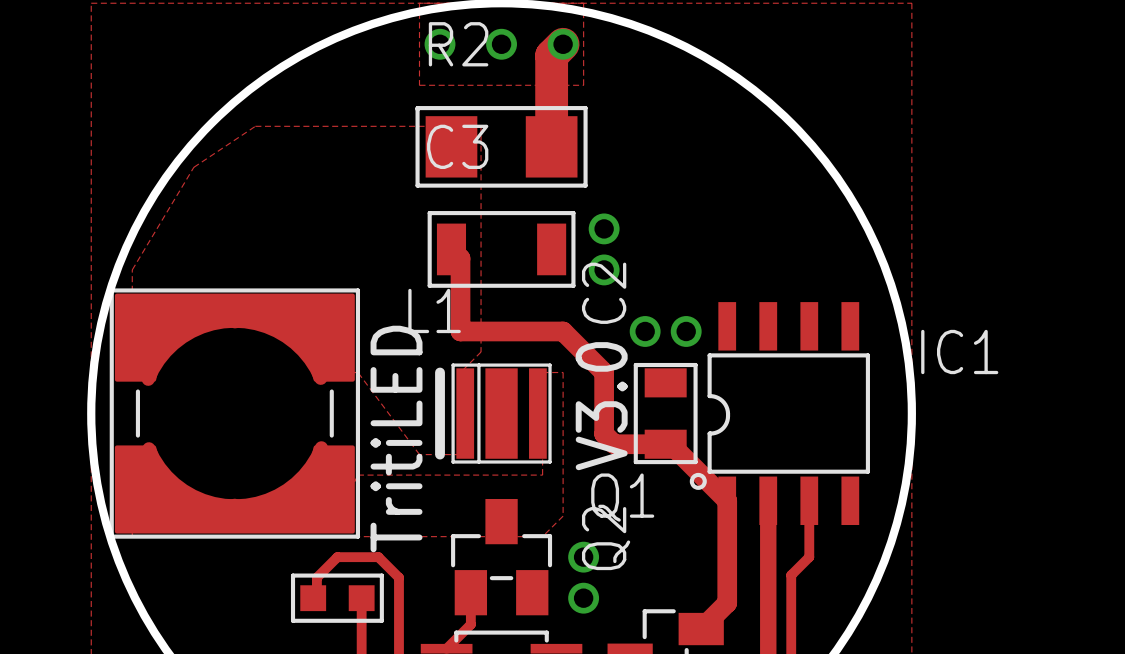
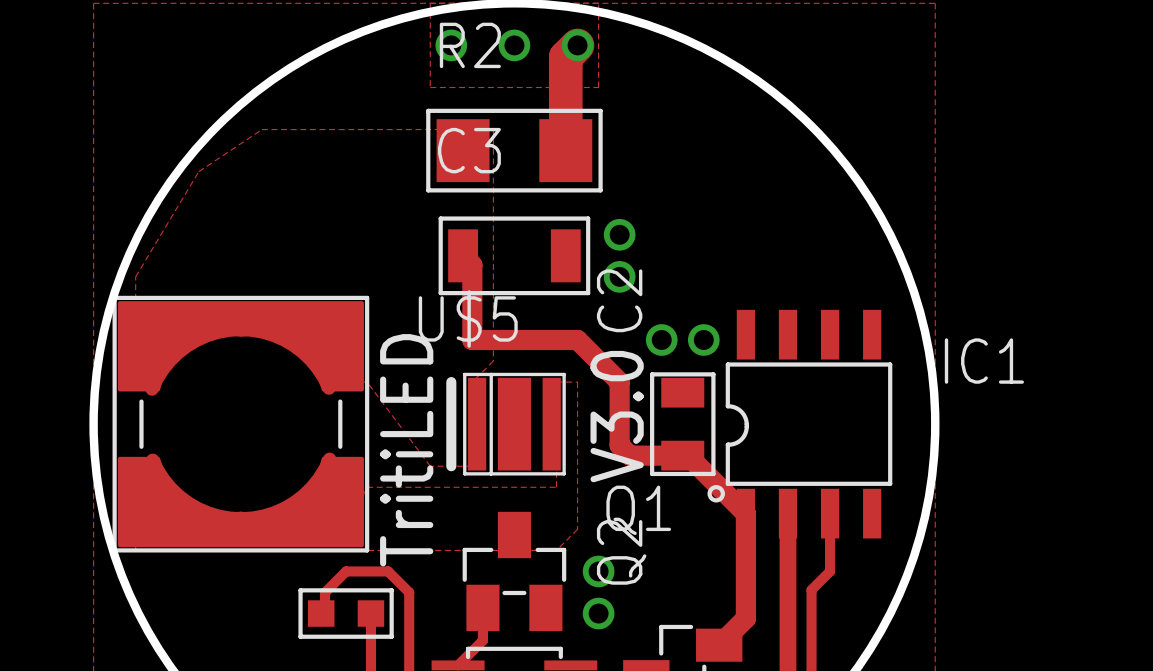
L1 name: L1 (434, 310) -> U$5 (468, 318)

